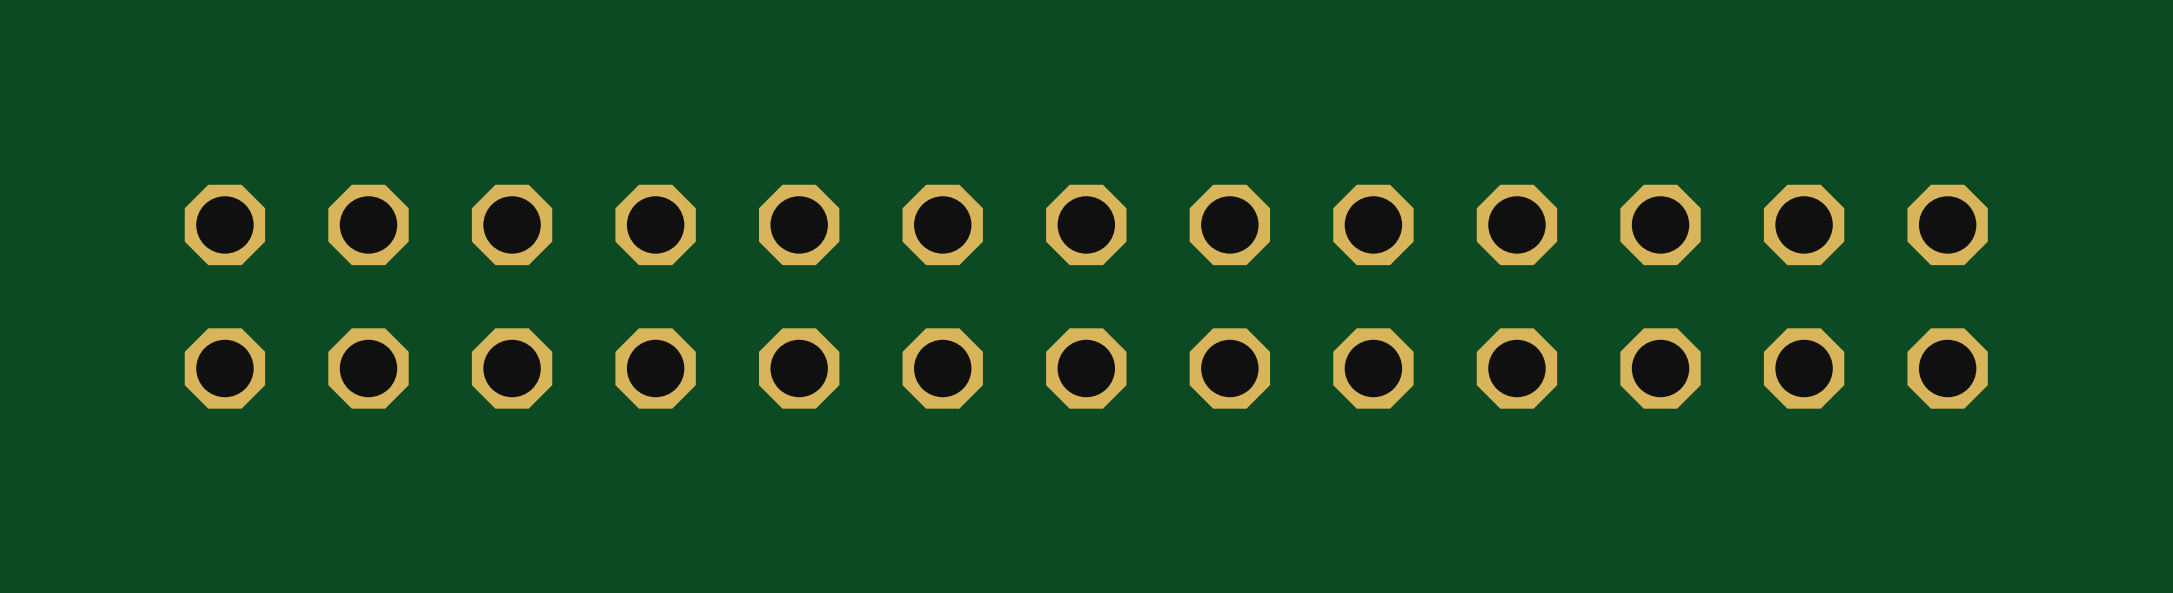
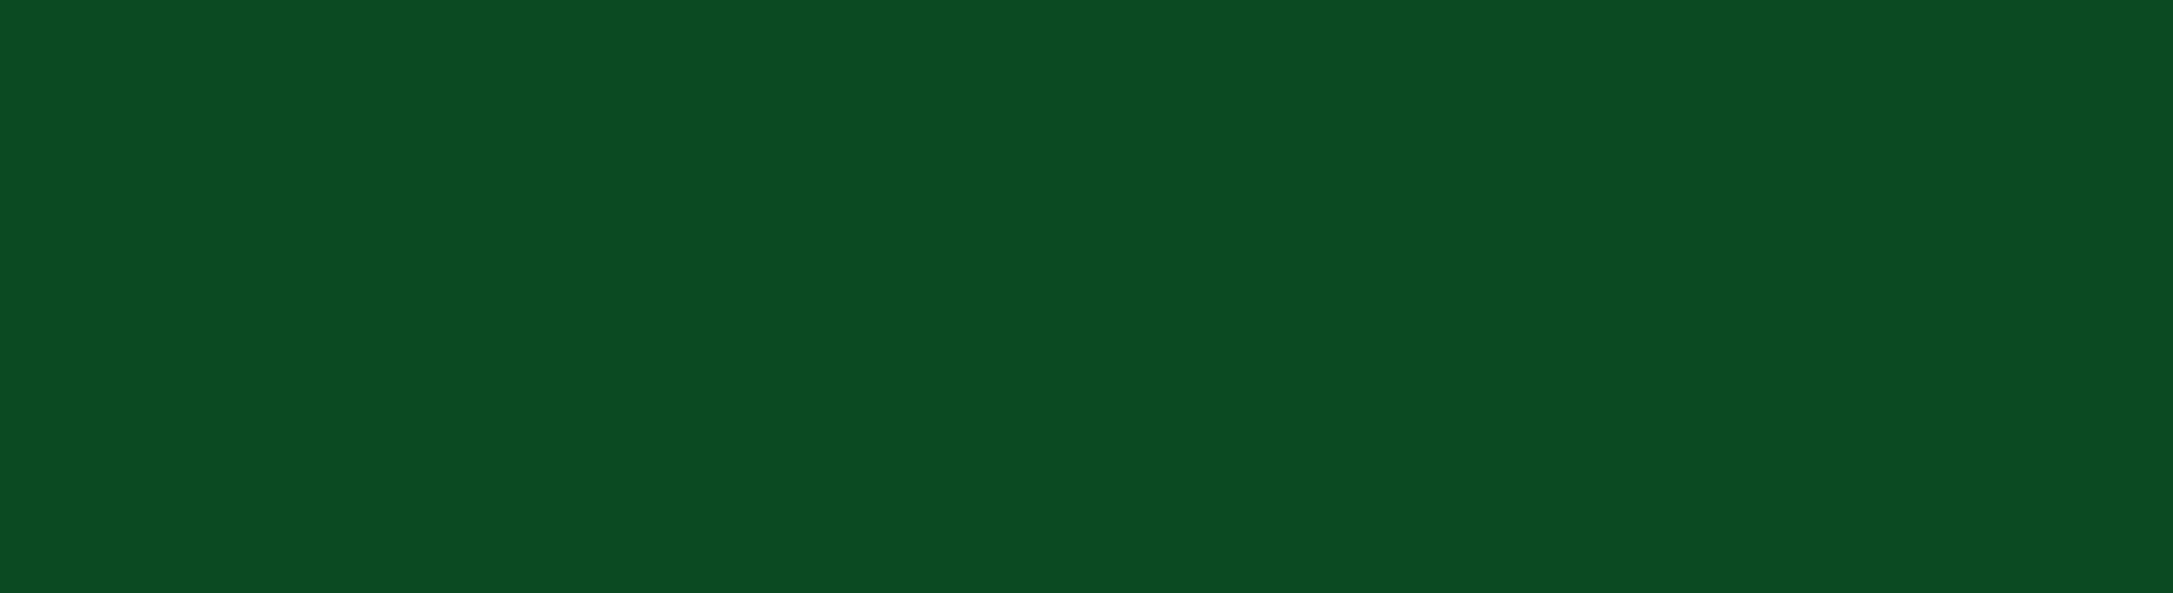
part: (1086, 296) -> none

